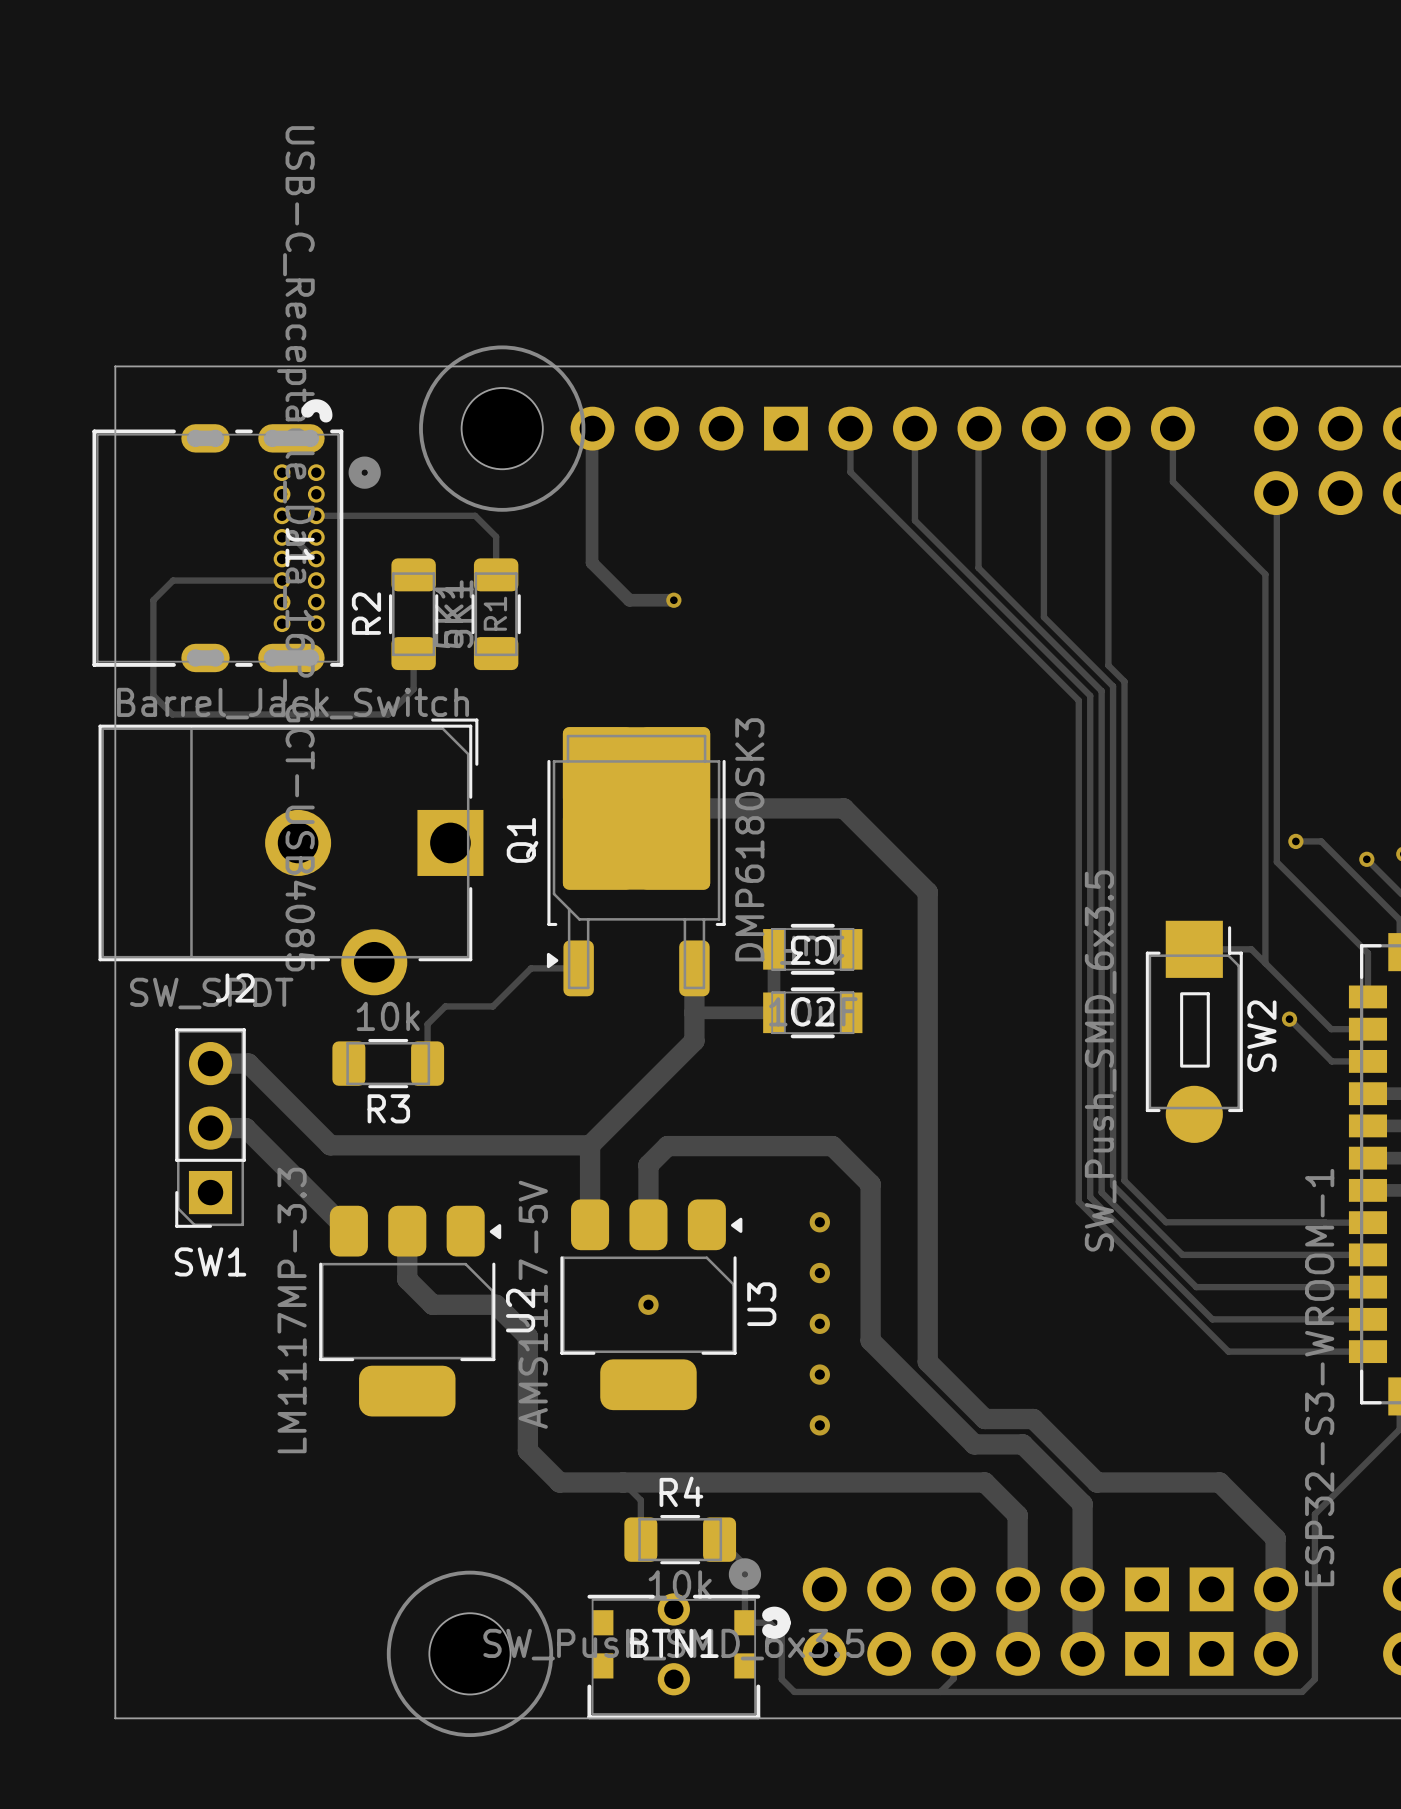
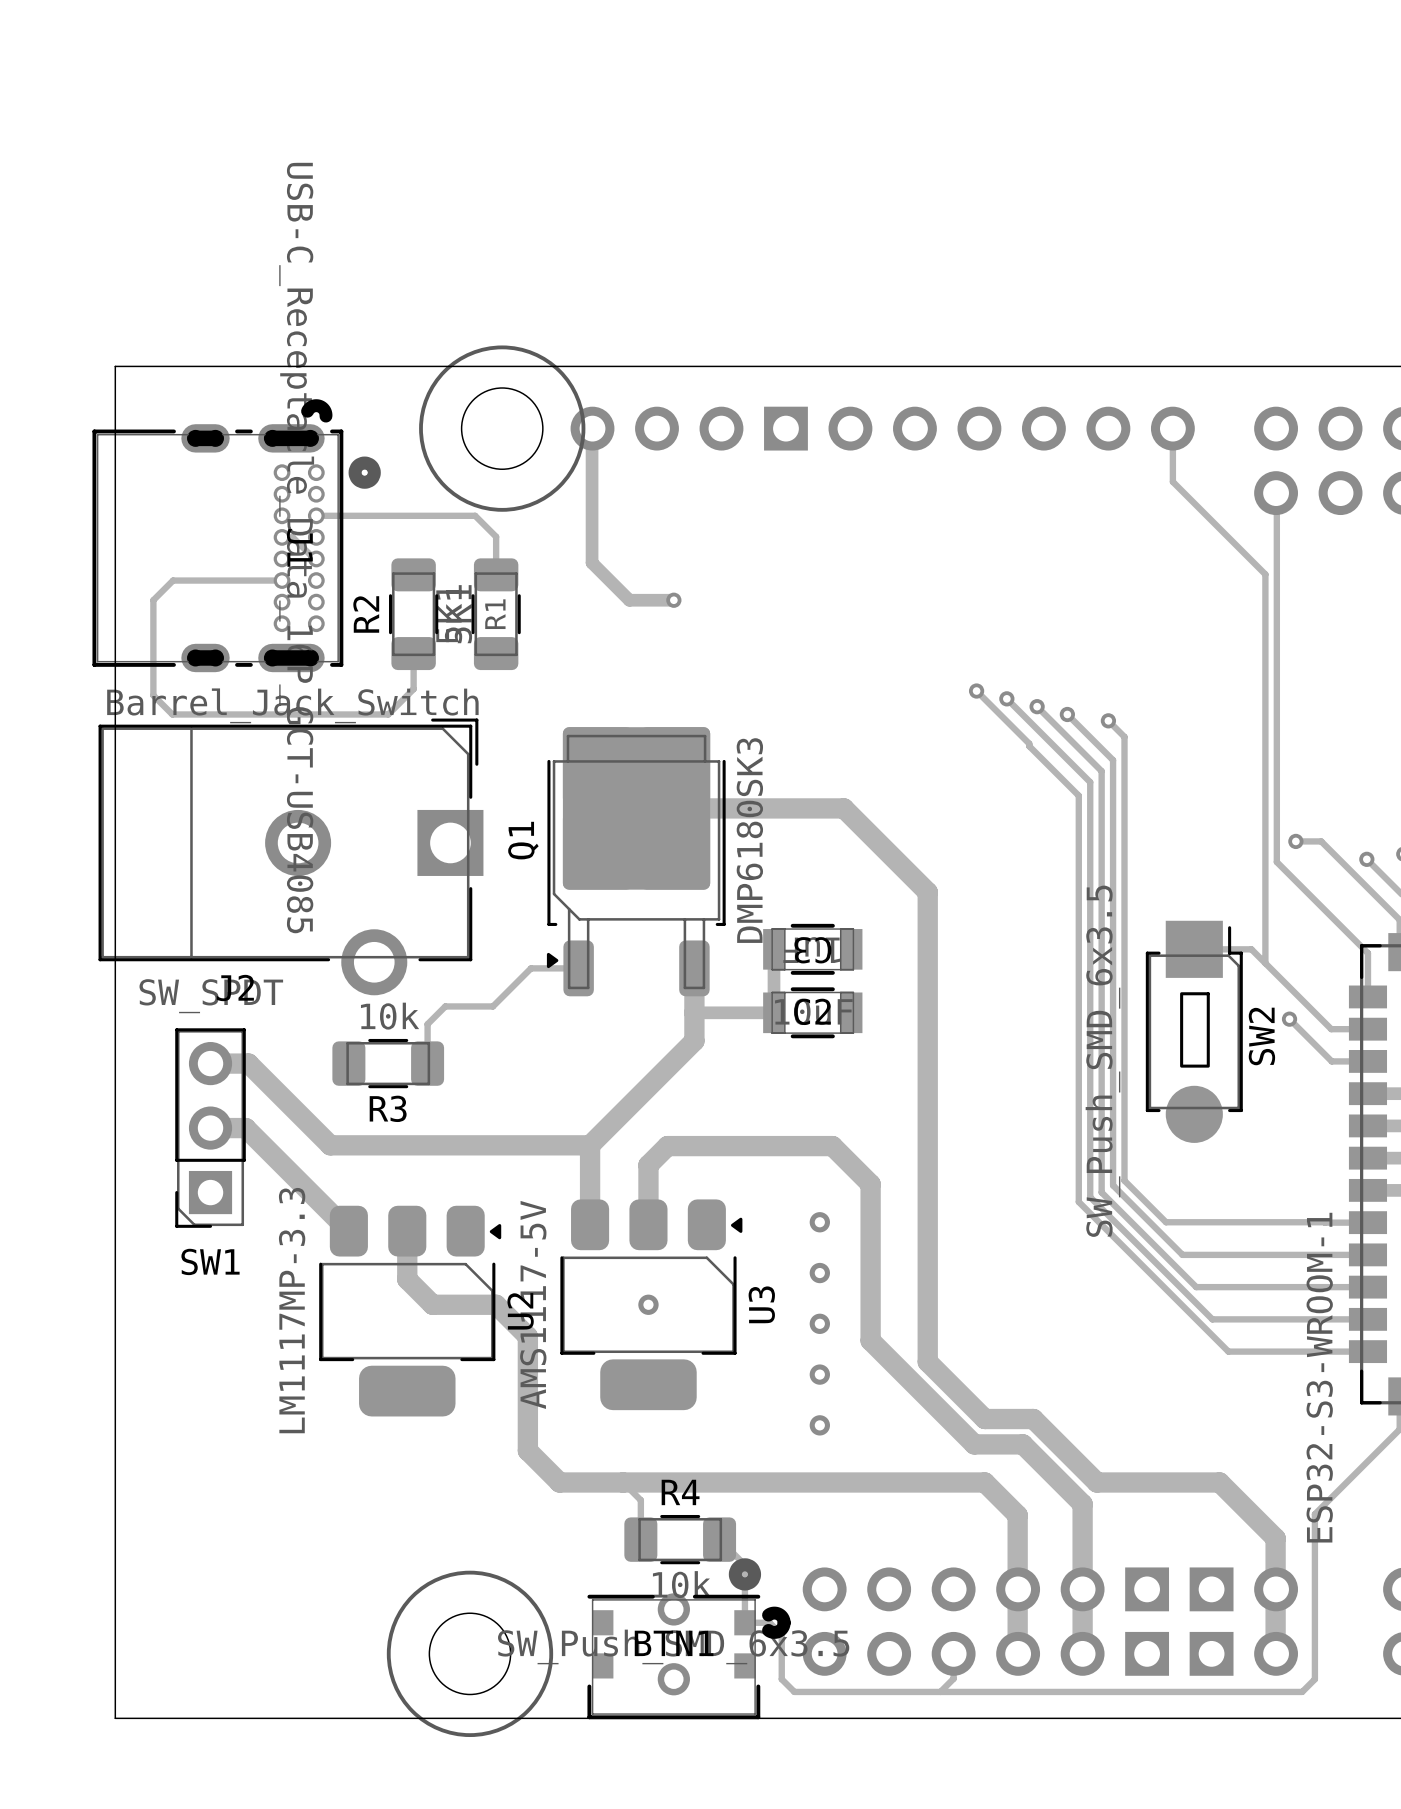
track: (850, 428) (850, 472) (1078, 700) (1078, 795) -> (976, 691) (1078, 795)
track: (914, 428) (914, 520) (1090, 695) (1090, 782) -> (1006, 698) (1090, 782)
track: (1043, 428) (1043, 617) (1113, 686) (1113, 760) -> (1067, 714) (1113, 760)
track: (1108, 428) (1108, 665) (1124, 681) (1124, 736) -> (1108, 720) (1124, 736)
track: (978, 429) (978, 567) (1101, 691) (1101, 771) -> (1037, 706) (1101, 771)
via: none -> (976, 691)
via: none -> (1006, 698)
via: none -> (1037, 706)
via: none -> (1067, 714)
via: none -> (1108, 720)

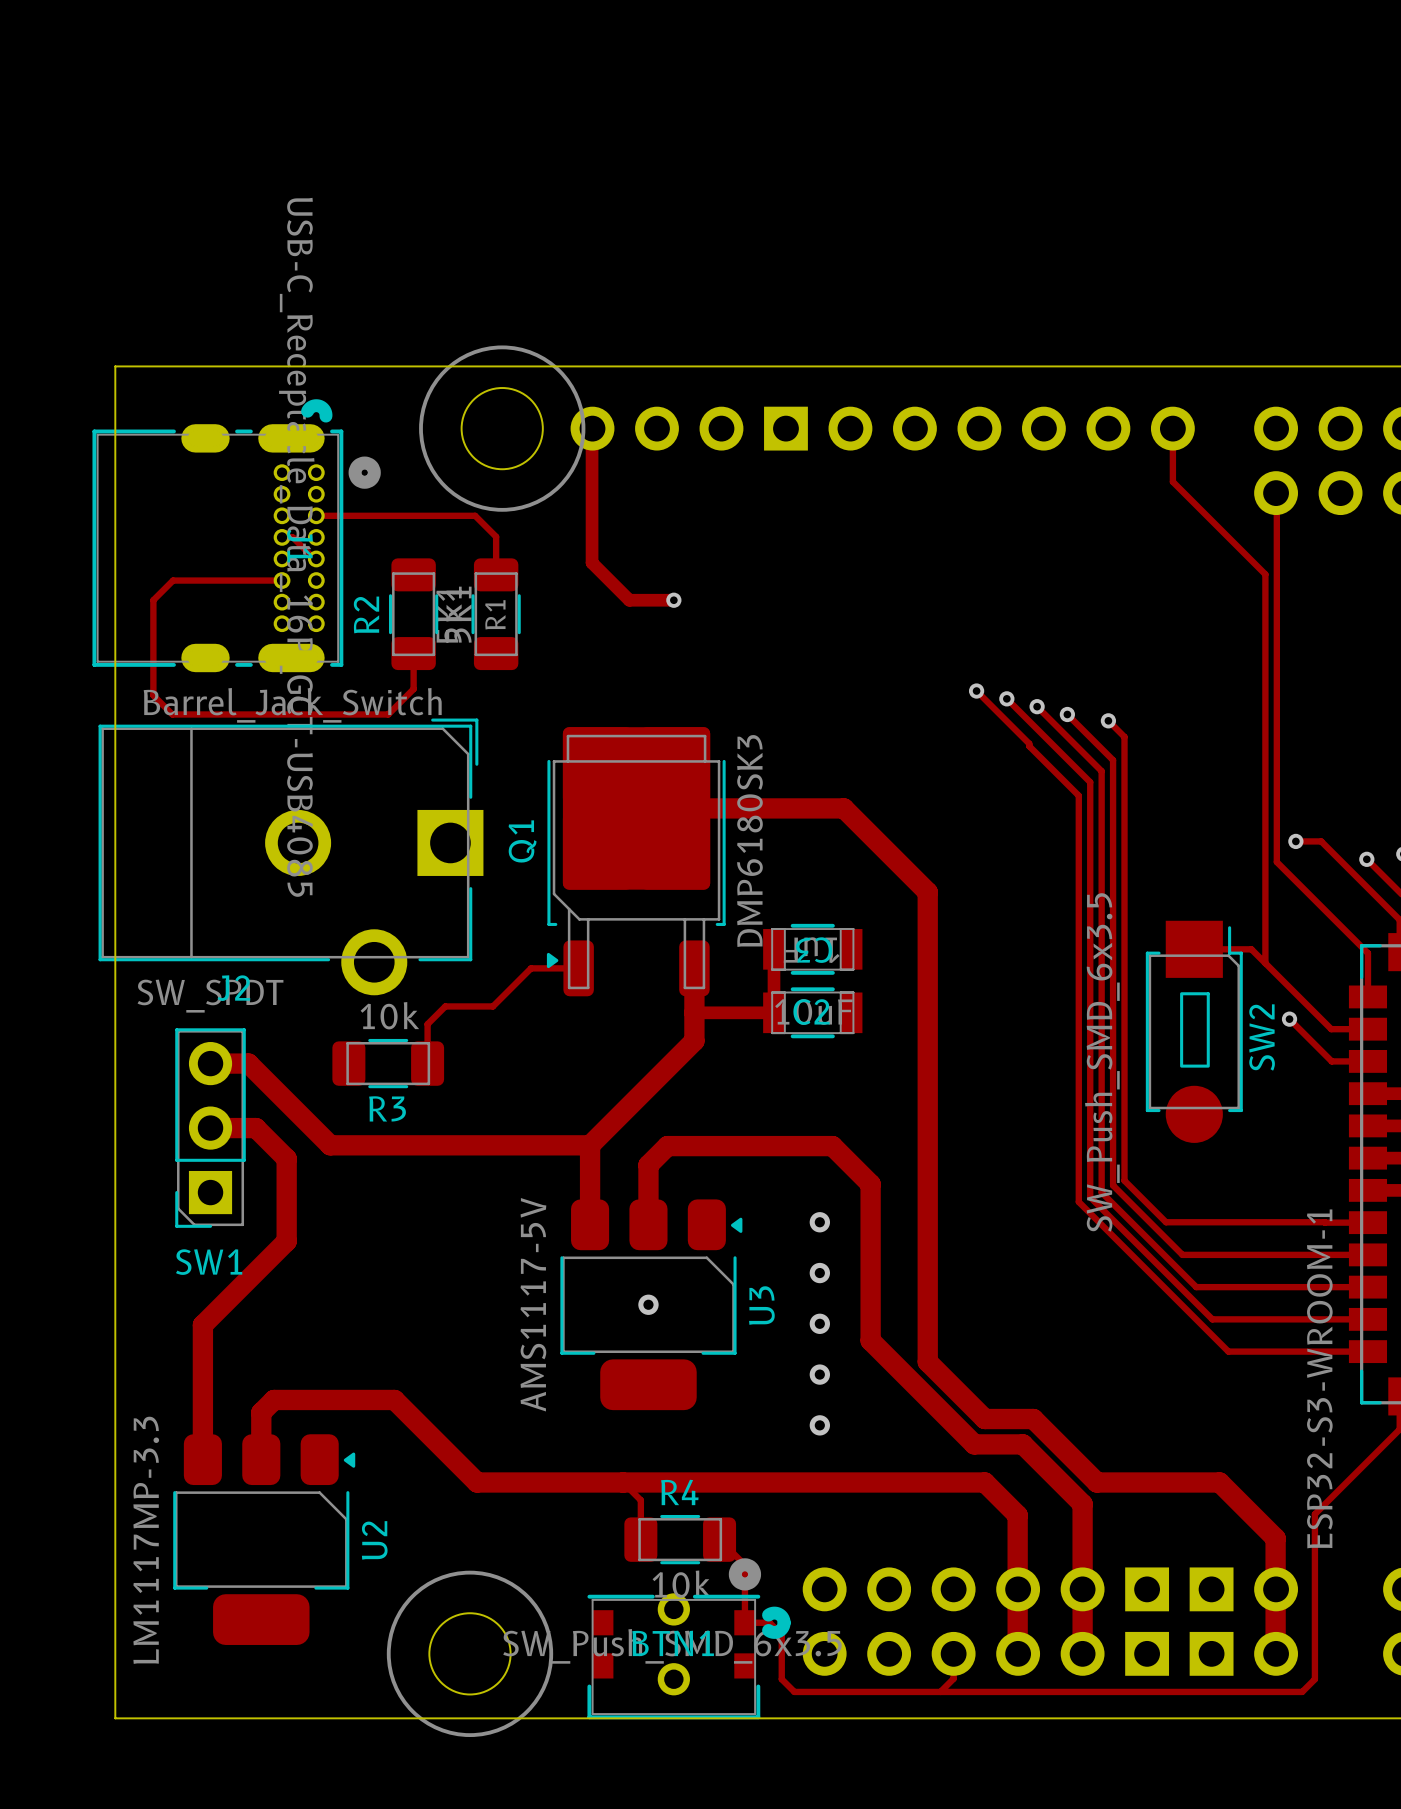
track: (245, 1128) (348, 1231) -> (245, 1128) (255, 1128) (286, 1158) (286, 1241) (202, 1325) (202, 1459)
track: (407, 1231) (407, 1279) (432, 1304) (496, 1304) (527, 1336) (527, 1450) (559, 1482) -> (261, 1459) (261, 1412) (273, 1399) (394, 1399) (477, 1482) (559, 1482)
U2 position: (410, 1311) -> (264, 1539)

